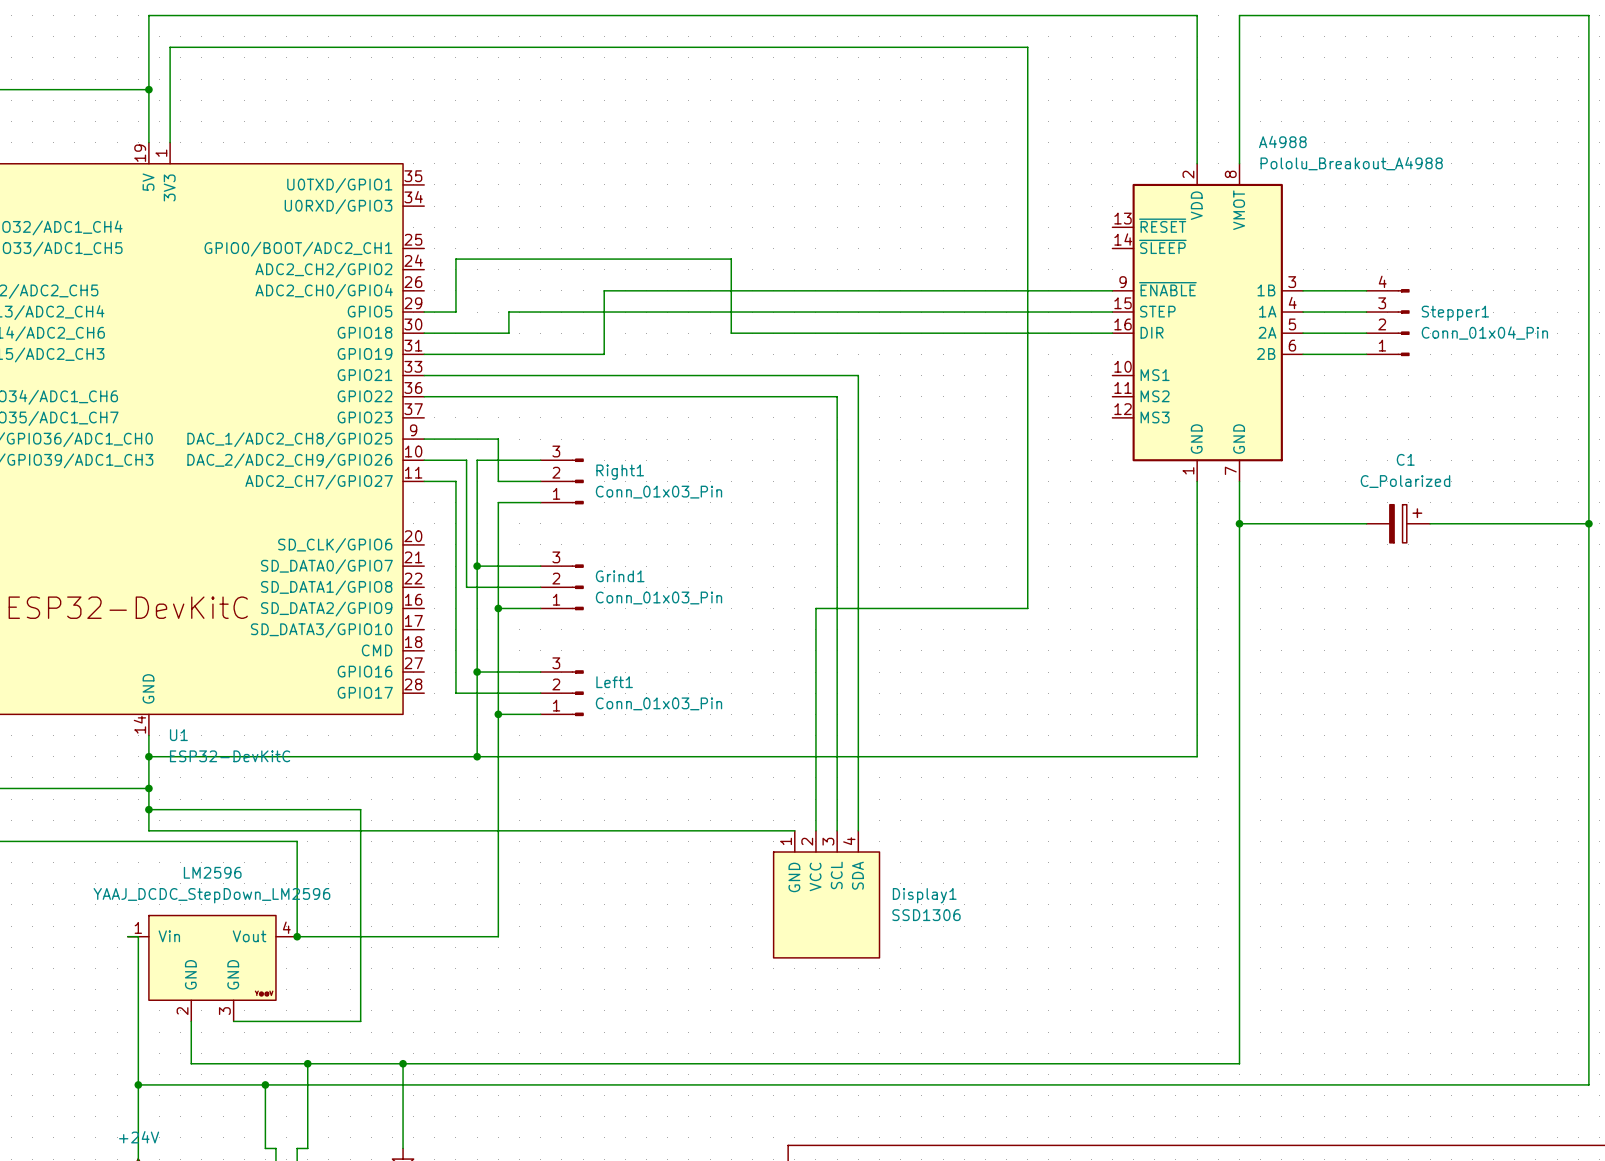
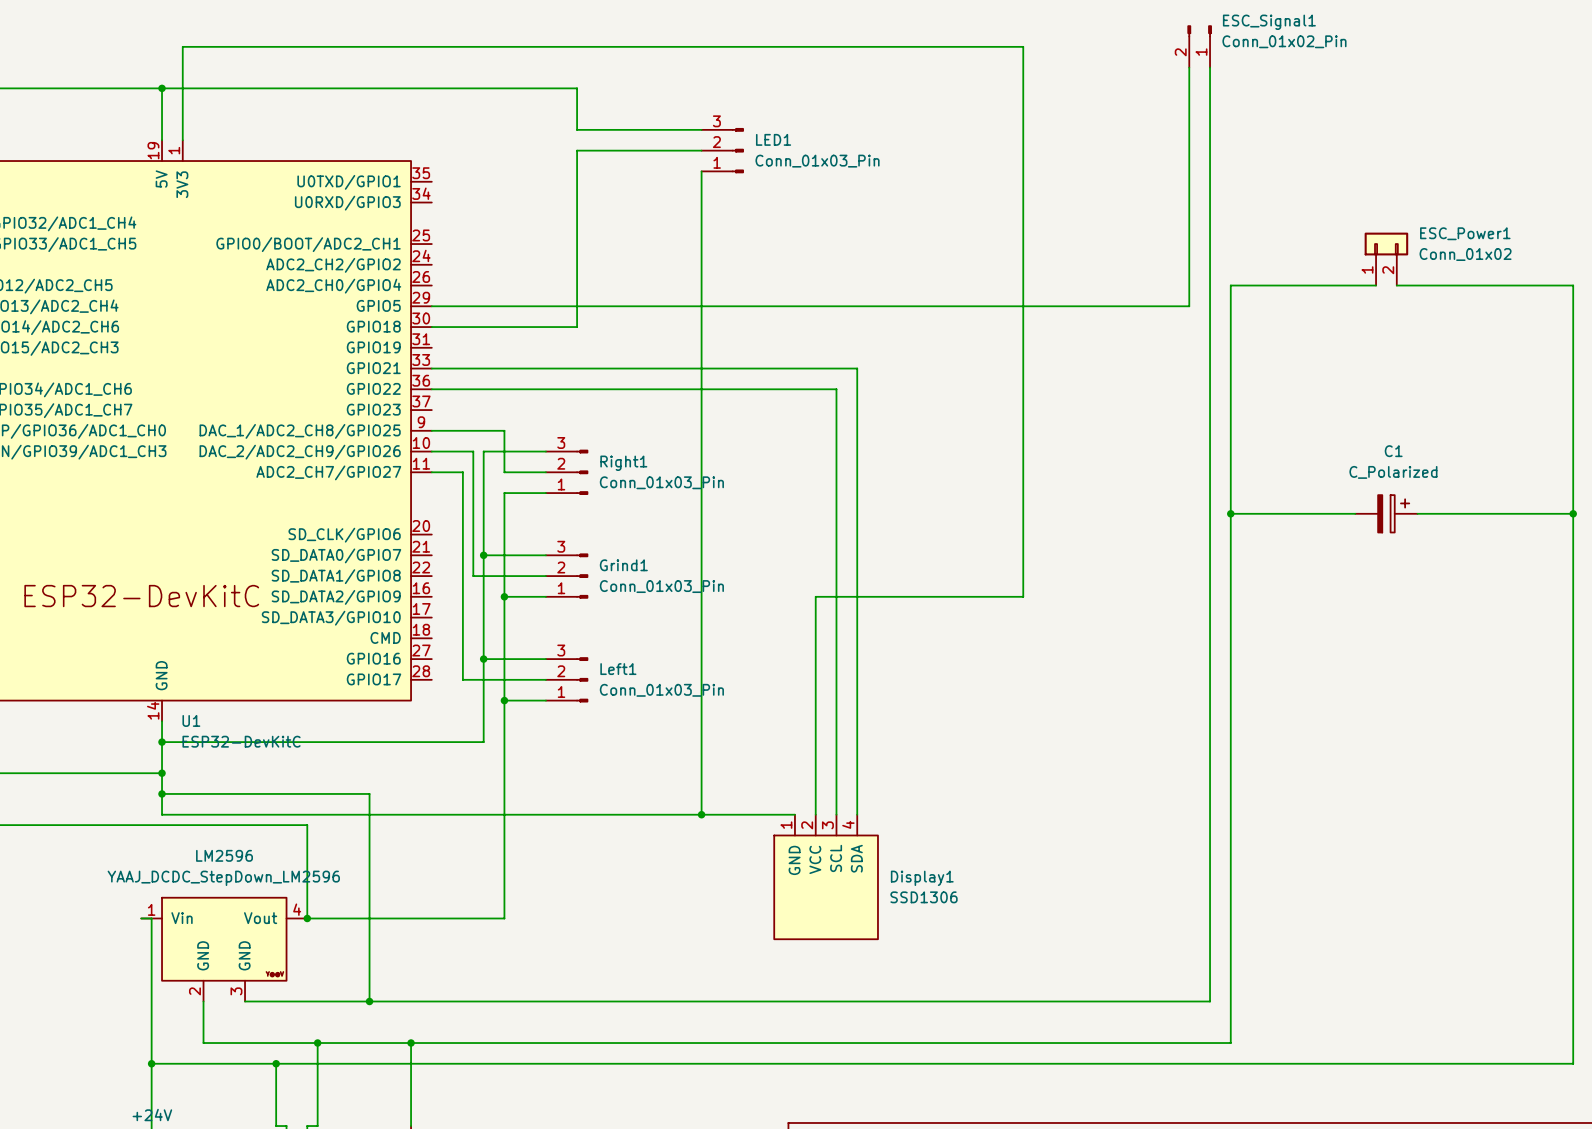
ESC_Signal1: none -> Conn_01x02_Pin (1199, 46)
wire: (1197, 68) (1197, 15) (148, 15) (148, 89) -> (701, 129) (577, 129) (577, 88) (162, 88)
wire: none -> (1210, 67) (1210, 1001) (369, 1001)
wire: none -> (701, 150) (577, 150) (577, 327) (514, 327)
LED1: none -> Conn_01x03_Pin (722, 150)
wire: (1239, 163) (1239, 15) (1588, 15) (1588, 290) -> (1396, 285) (1573, 285)
wire: none -> (701, 171) (701, 814)
ESC_Power1: none -> Conn_01x02 (1386, 259)
wire: (1112, 290) (604, 290) (604, 354) (424, 354) -> none
wire: (455, 312) (455, 259) (731, 259) (731, 333) (1112, 333) -> none
wire: (508, 312) (508, 333) -> (514, 306) (462, 306)
wire: (1303, 312) (1366, 312) -> none
A4988: Pololu_Breakout_A4988 (1207, 322) -> none
Stepper1: Conn_01x04_Pin (1388, 322) -> none
wire: (1303, 333) (1366, 333) -> none
wire: (1303, 354) (1366, 354) -> none
wire: (1197, 481) (1197, 756) (477, 756) -> none
junction: (477, 756) -> none
junction: none -> (701, 814)
junction: none -> (369, 1001)

